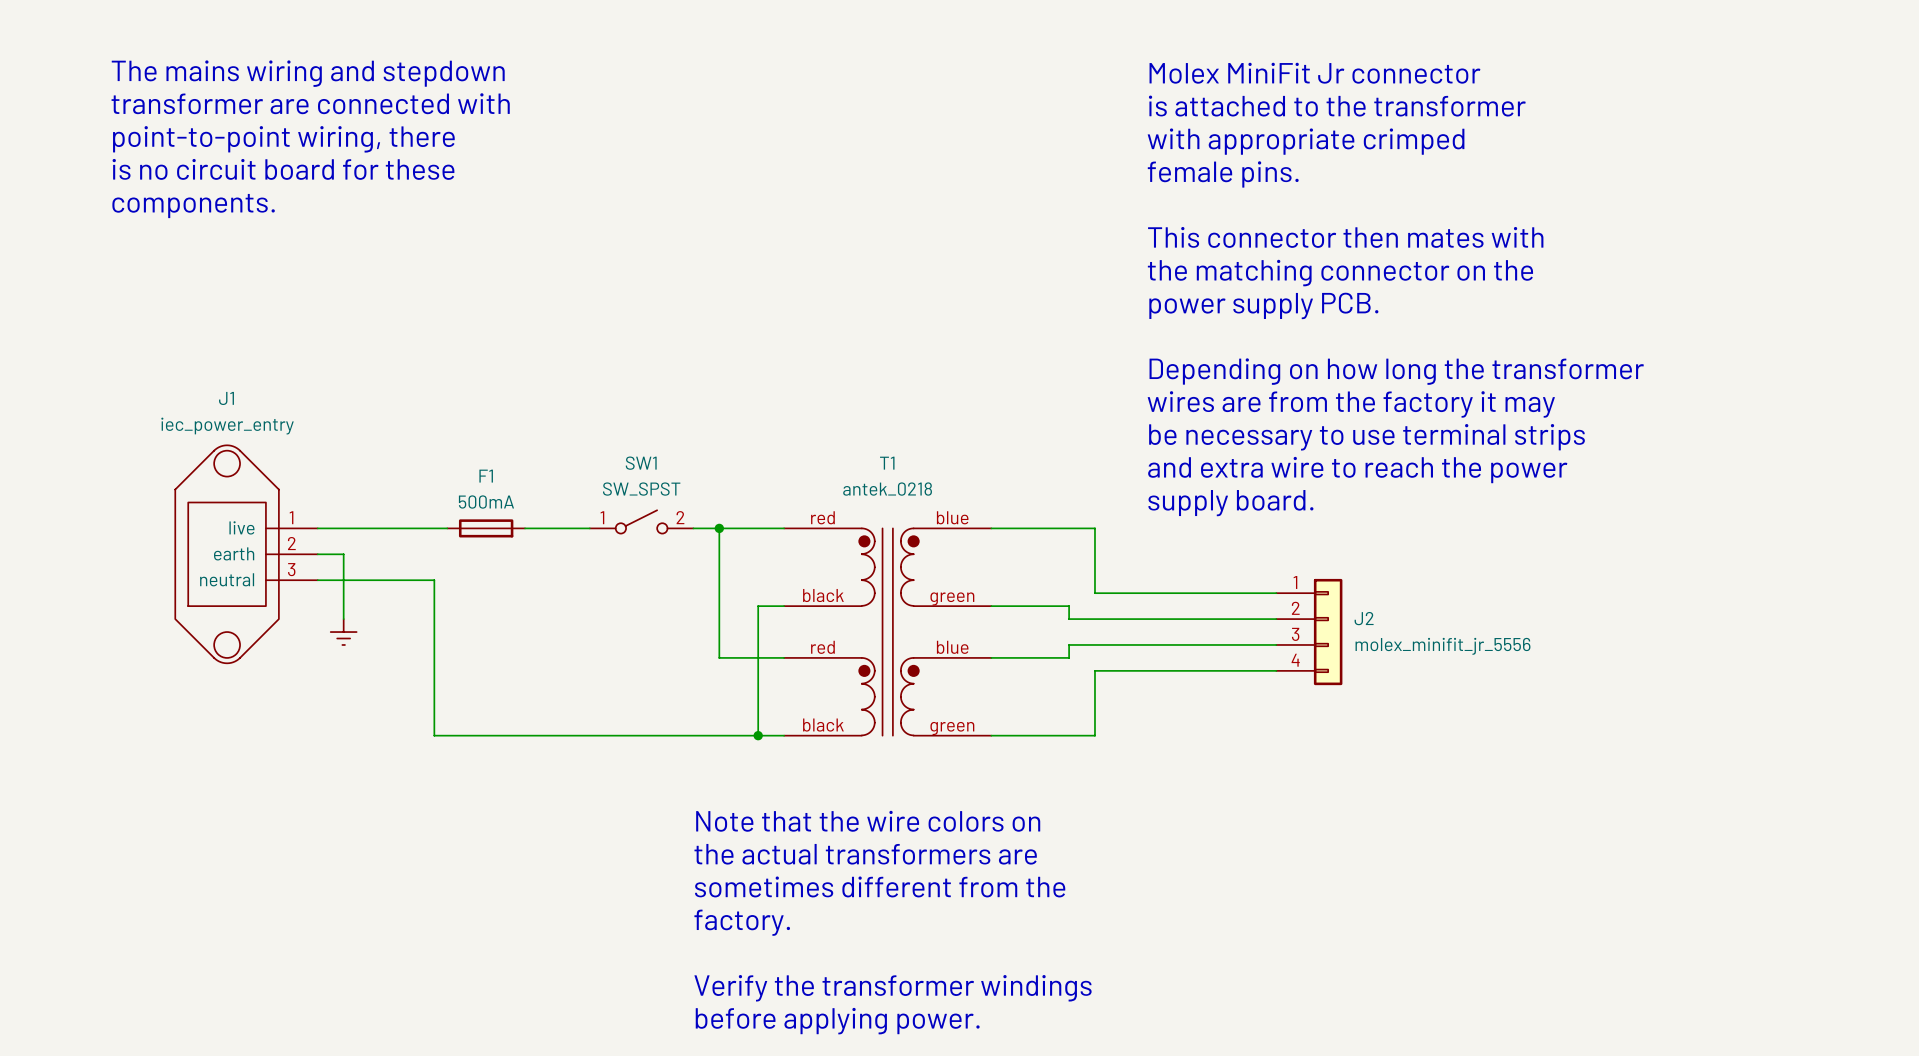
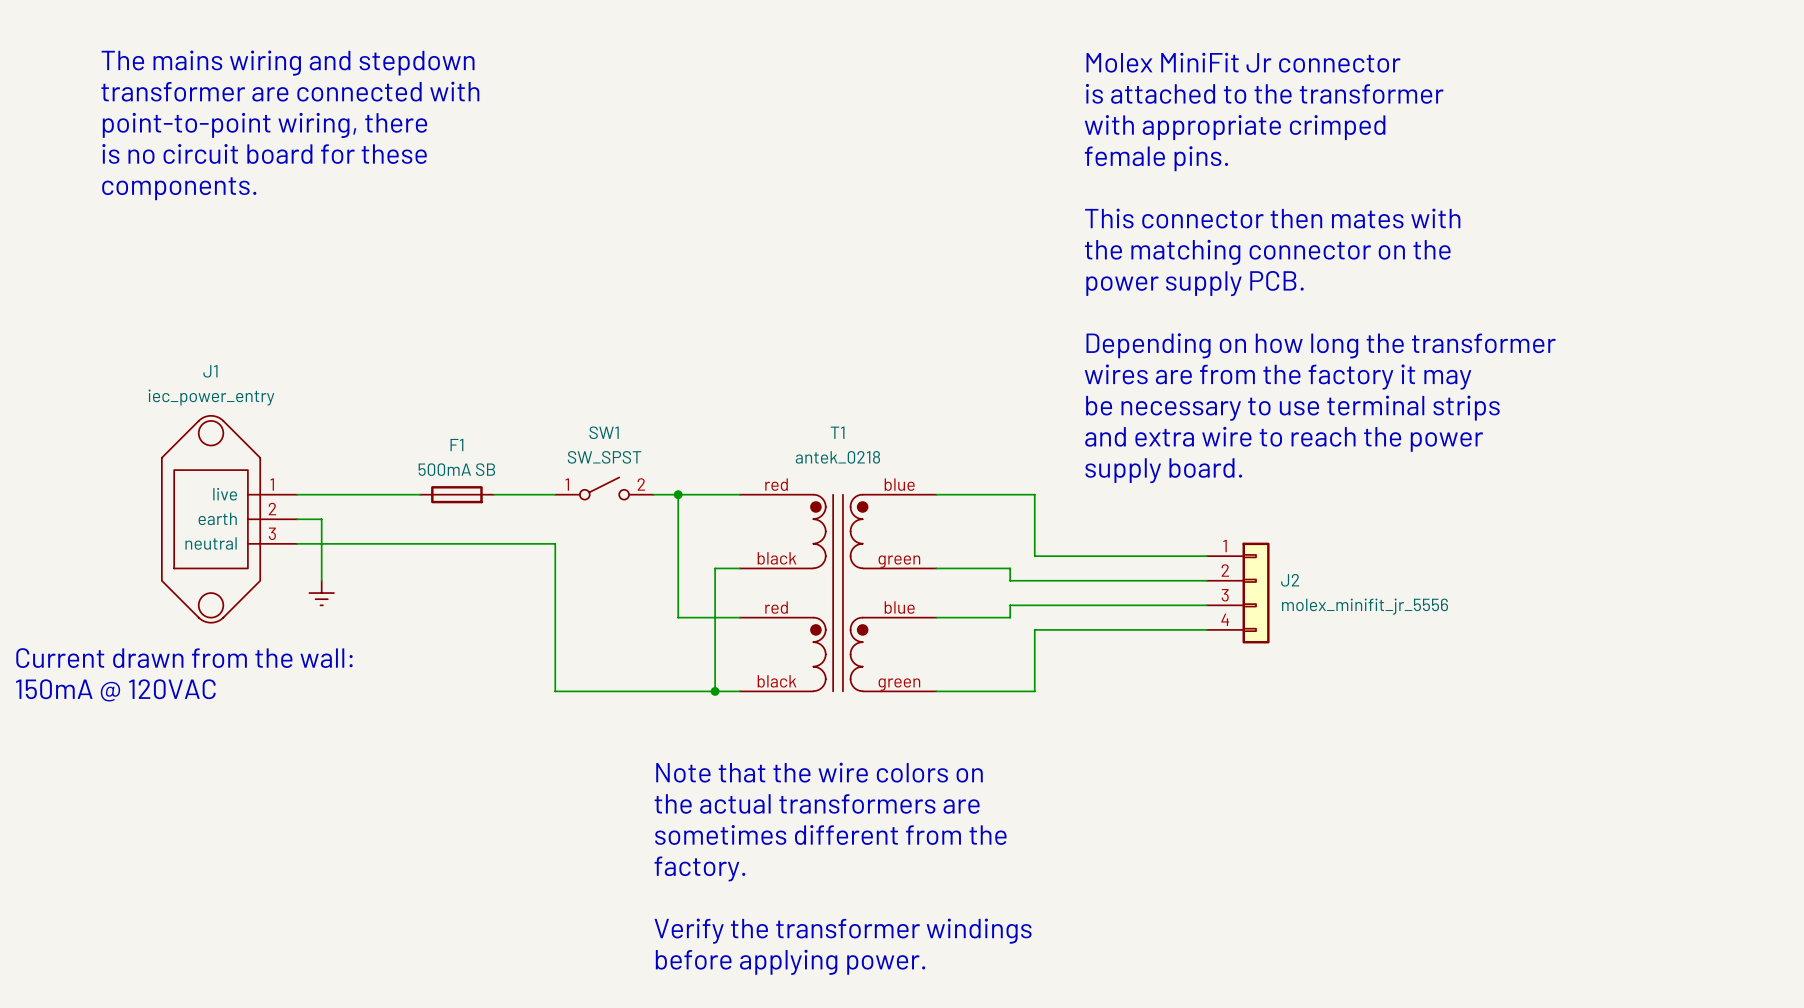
F1 value: 500mA (486, 502) -> 500mA SB (456, 469)
wire: (434, 580) (434, 735) (589, 735) -> (407, 543) (555, 543) (555, 691)
text: none -> Current drawn from the wall: (184, 658)
text: none -> 150mA @ 120VAC (115, 690)

